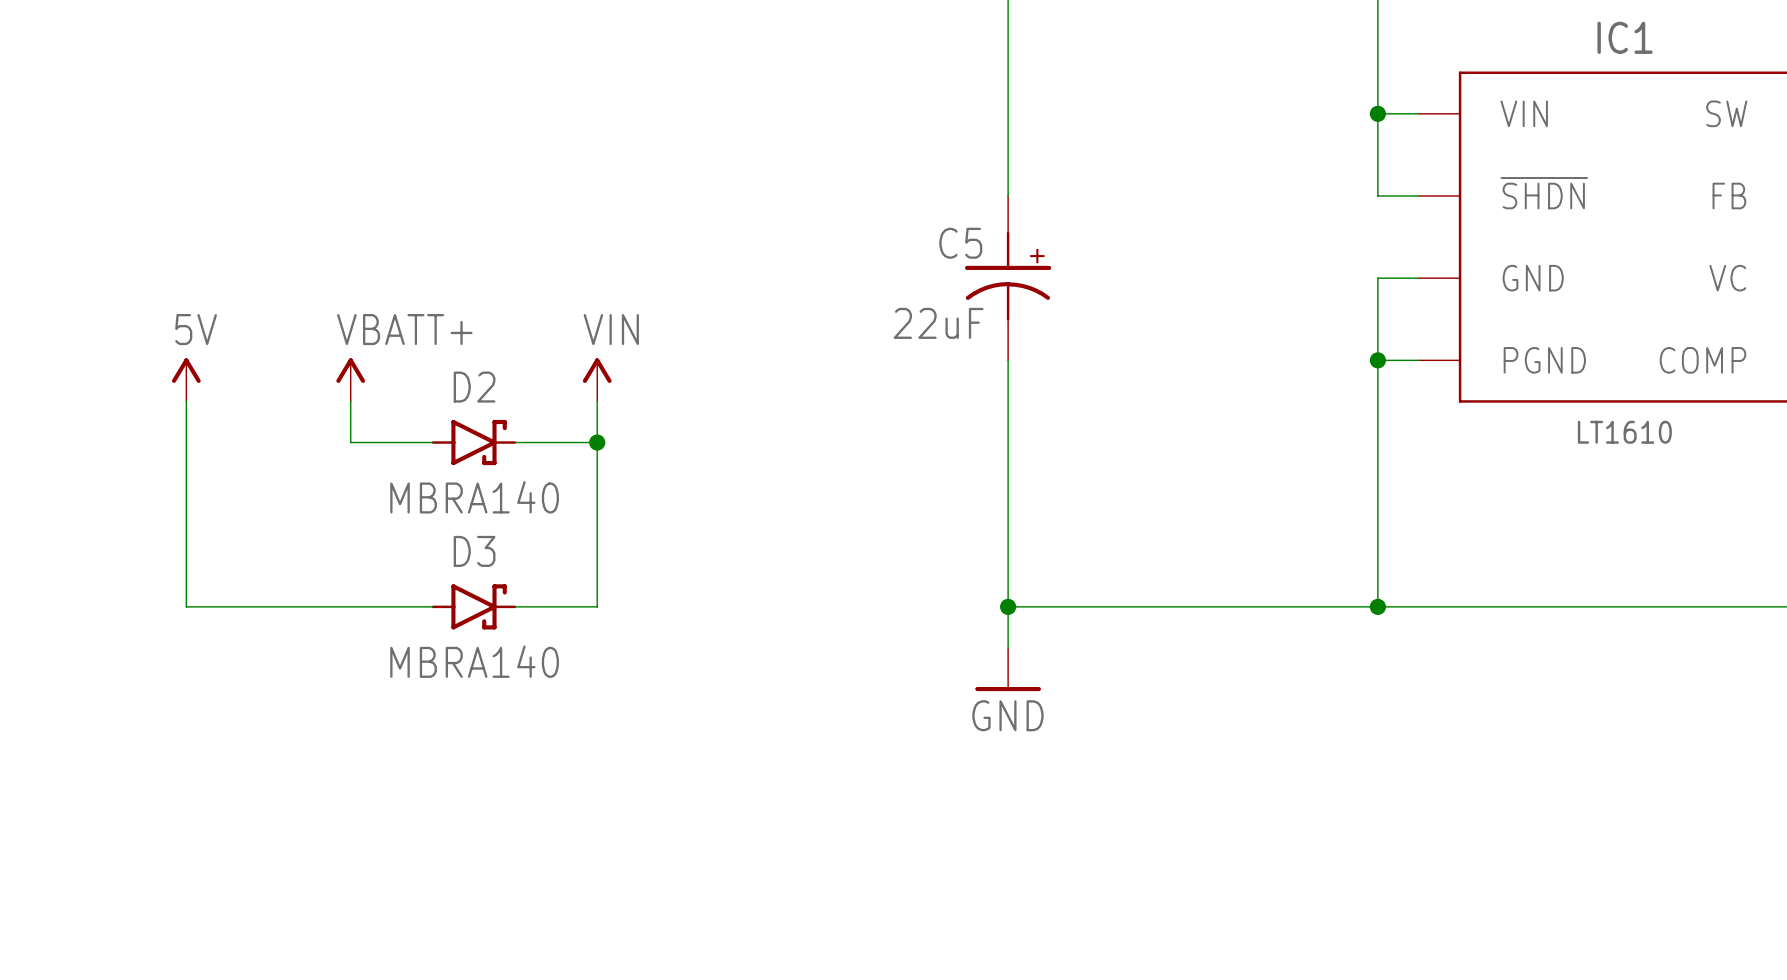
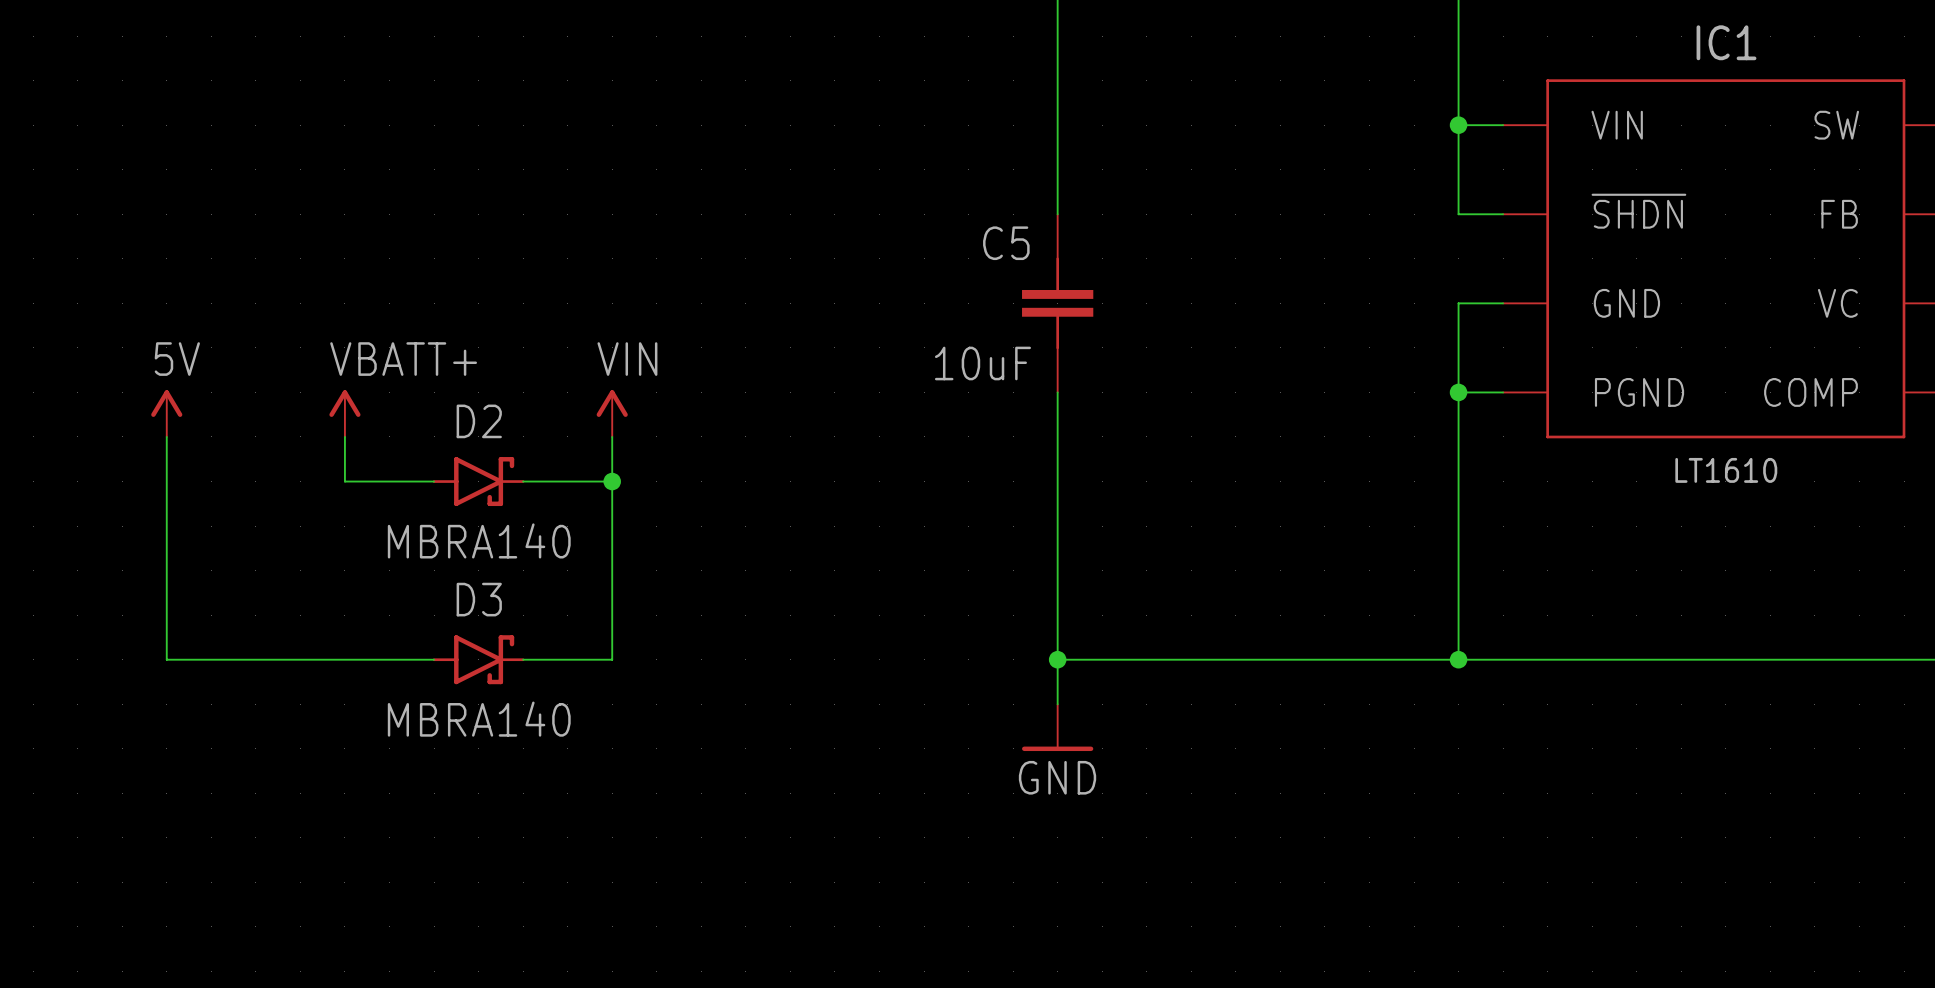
C5 symbol: [964, 196, 1052, 361] -> [1022, 214, 1094, 393]
C5 value: 22uF (938, 323) -> 10uF (982, 363)

